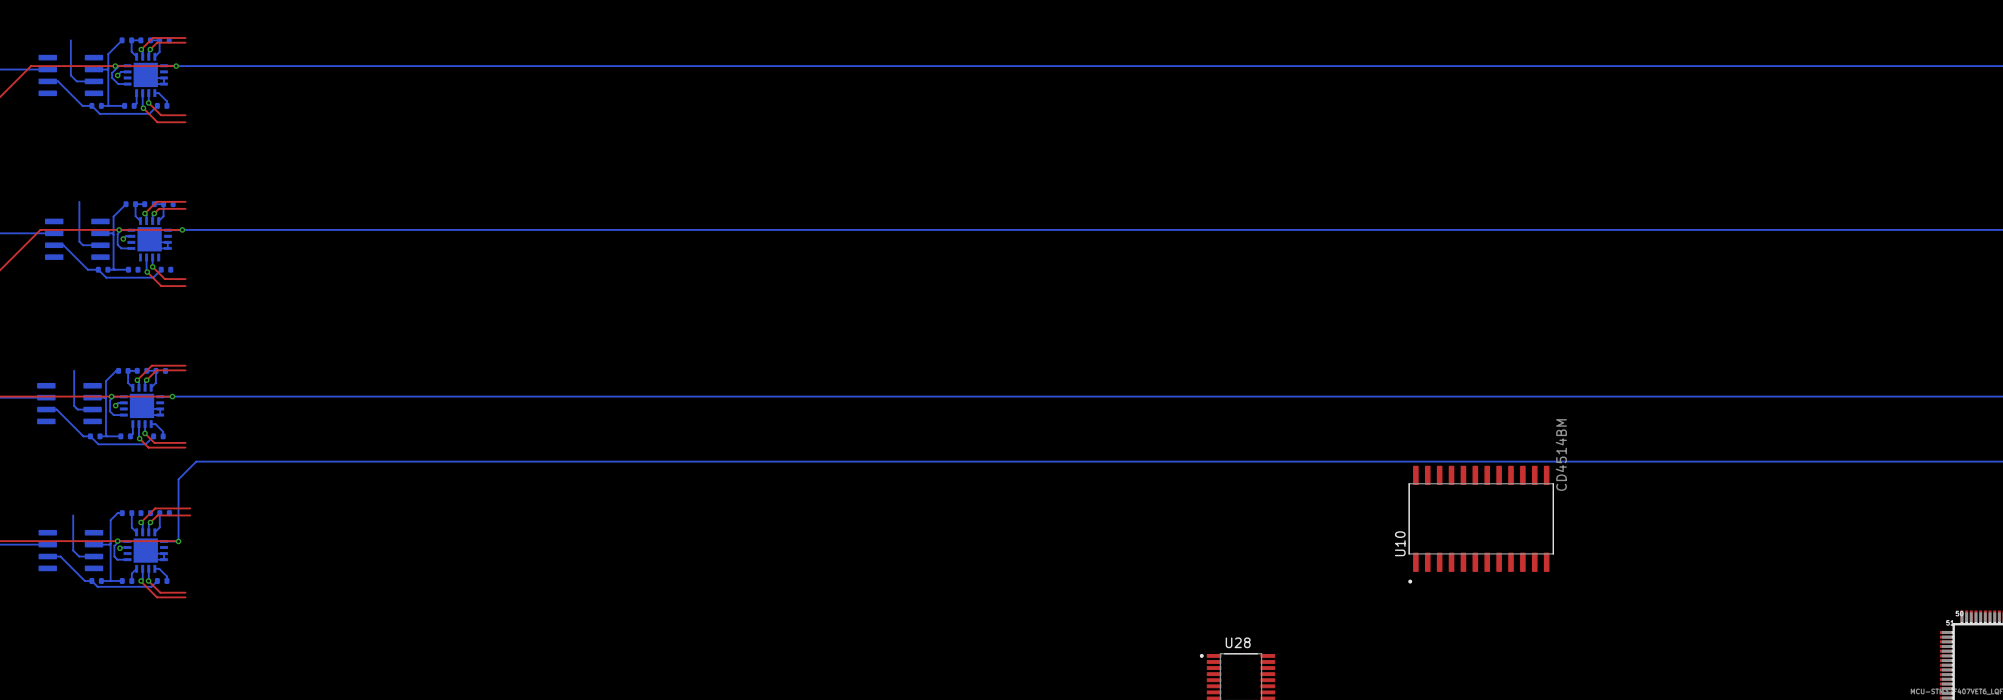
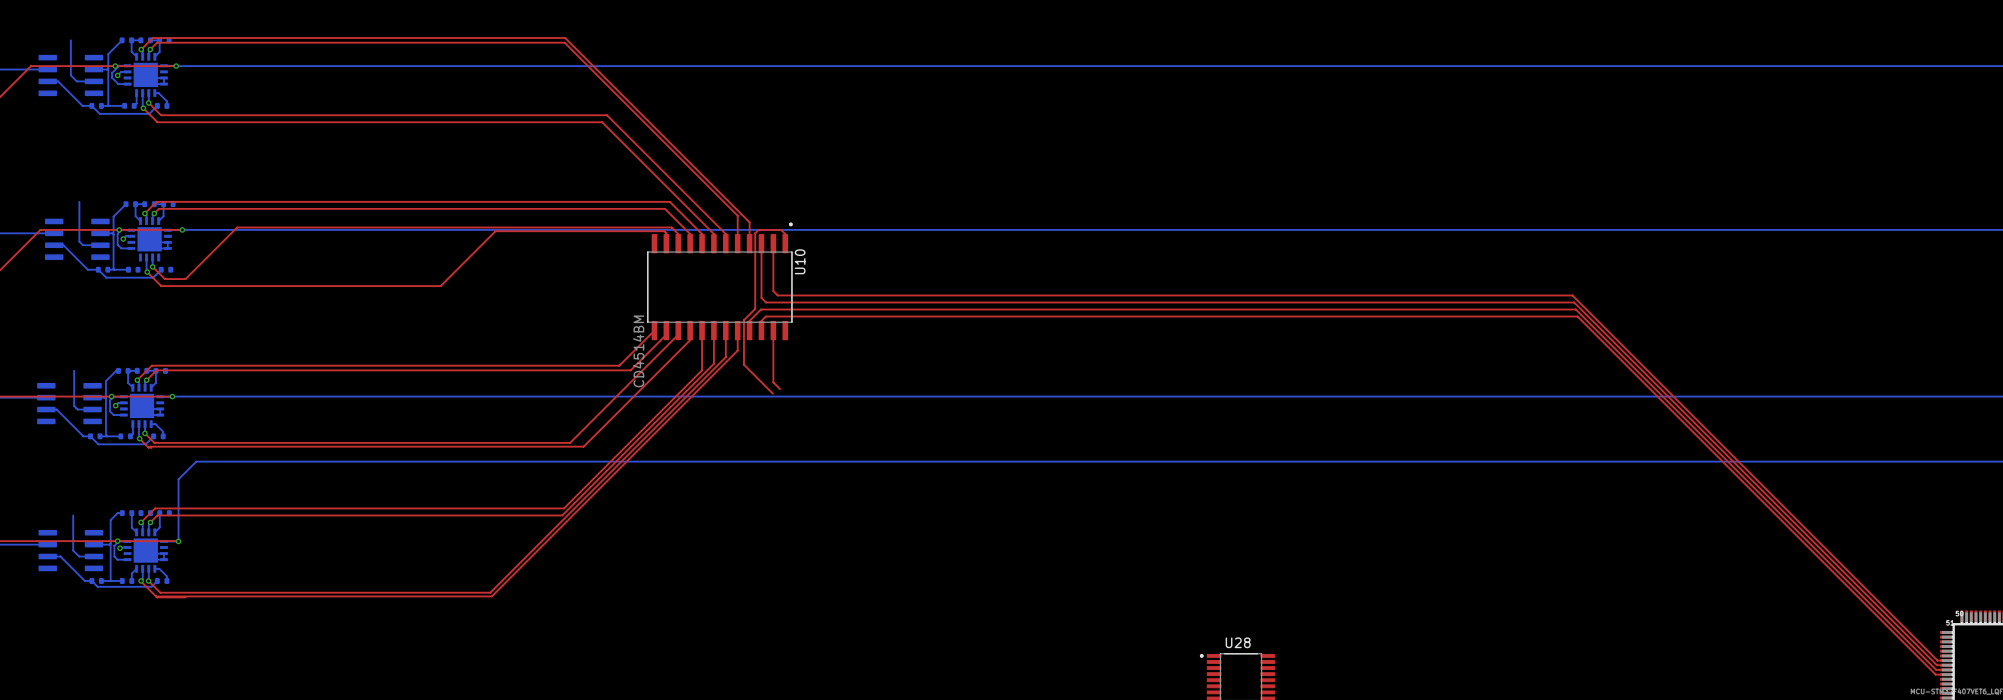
top track: none -> (185, 38) (565, 38) (749, 222) (749, 243)
top track: none -> (185, 42) (564, 42) (737, 215) (737, 243)
top track: none -> (185, 115) (607, 115) (725, 234) (725, 243)
top track: none -> (185, 122) (602, 122) (713, 234) (713, 243)
top track: none -> (185, 201) (669, 201) (702, 234) (702, 243)
top track: none -> (185, 208) (664, 208) (690, 234) (690, 243)
top track: none -> (666, 243) (666, 233) (664, 231) (495, 231) (440, 286) (185, 286)
top track: none -> (678, 243) (678, 234) (671, 227) (237, 227) (185, 279)
top track: none -> (761, 243) (761, 297) (765, 302) (1574, 302) (1936, 665) (1945, 665)
top track: none -> (773, 243) (773, 291) (777, 295) (1572, 295) (1937, 660) (1945, 660)
top track: none -> (785, 243) (785, 234) (781, 229) (758, 229) (755, 233) (755, 308) (743, 320) (743, 364) (773, 393)
top track: none -> (654, 330) (619, 365) (185, 365)
top track: none -> (666, 330) (666, 334) (630, 370) (185, 370)
top track: none -> (678, 330) (678, 334) (570, 442) (185, 442)
top track: none -> (702, 330) (702, 370) (563, 508) (190, 508)
top track: none -> (713, 330) (713, 363) (562, 515) (190, 515)
top track: none -> (725, 330) (725, 357) (490, 592) (185, 592)
top track: none -> (737, 330) (737, 350) (491, 596) (156, 596)
top track: none -> (749, 330) (749, 320) (761, 309) (1575, 309) (1936, 669) (1945, 669)
top track: none -> (761, 330) (761, 320) (765, 316) (1577, 316) (1935, 674) (1945, 674)
top track: none -> (773, 330) (773, 382) (780, 389)
top track: (151, 447) (185, 447) -> (151, 447) (583, 446) (690, 340) (690, 330)
U10 rotation: 0° (1481, 524) -> 180° (719, 281)
U10 position: (1481, 524) -> (719, 281)

